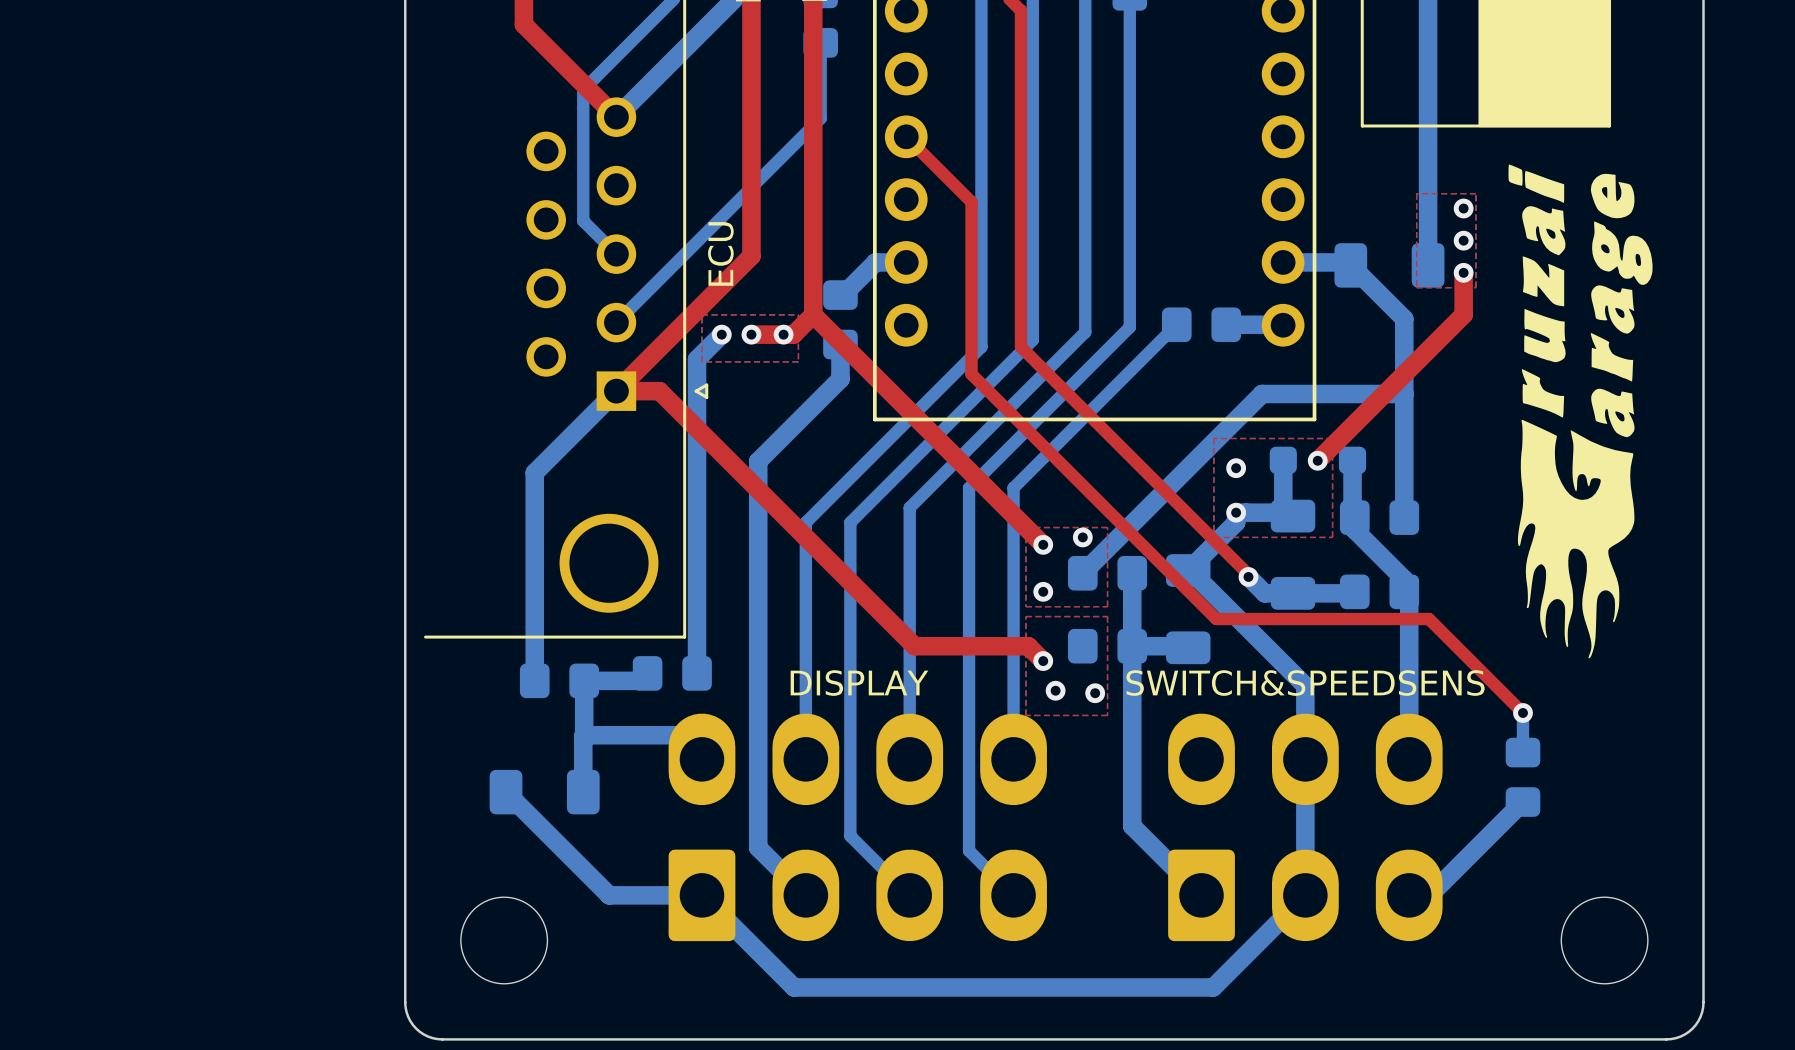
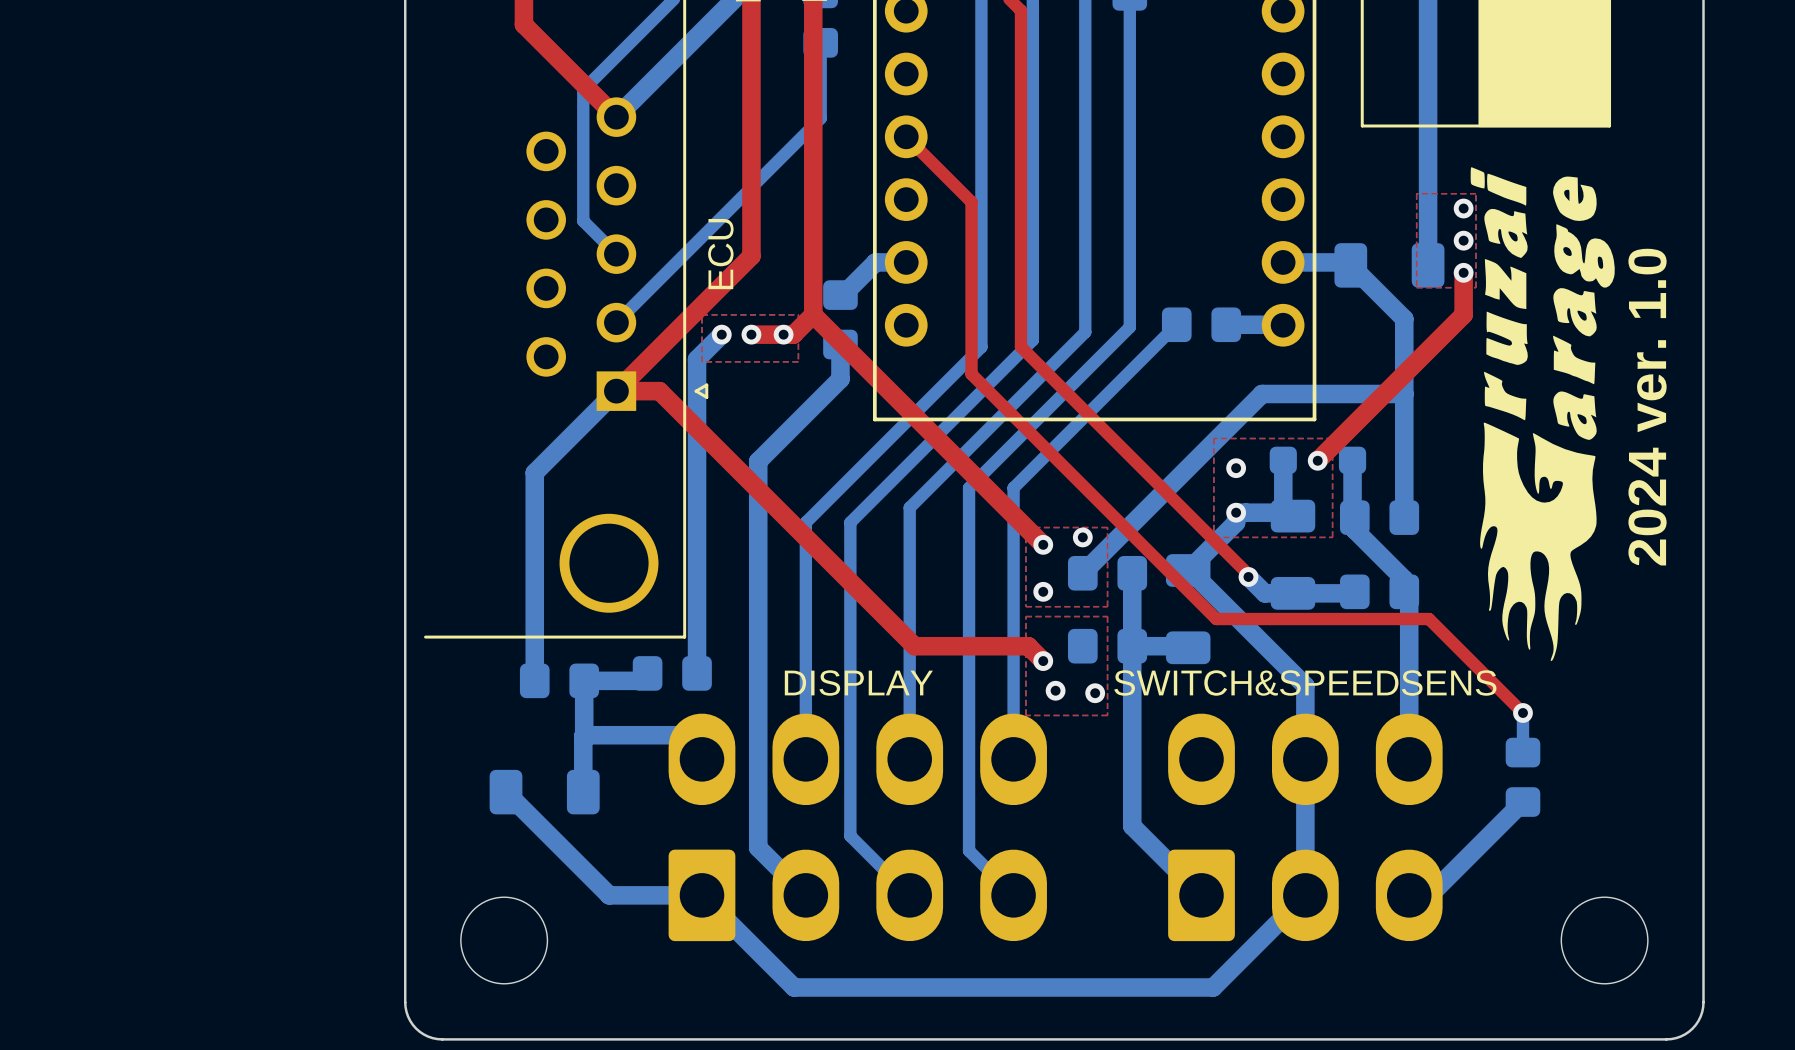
text: none -> 2024 ver. 1.0 (1647, 407)
drawing position: (1580, 411) -> (1542, 414)

